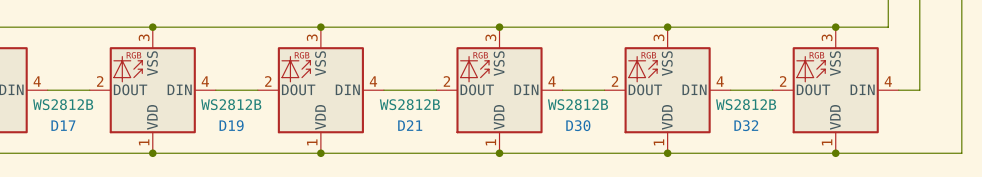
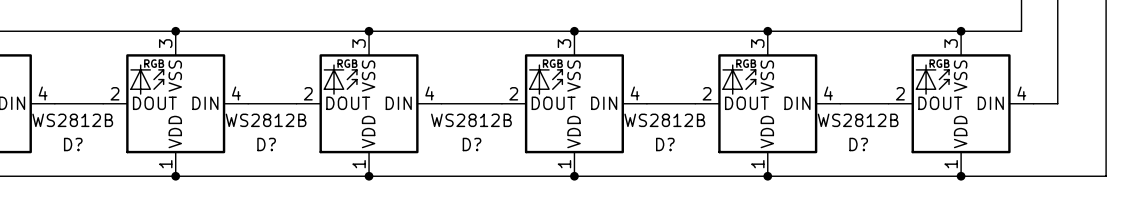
D17 name: D17 (63, 125) -> D? (73, 144)
D19 name: D19 (231, 125) -> D? (266, 144)
D21 name: D21 (410, 125) -> D? (472, 144)
D30 name: D30 (578, 125) -> D? (665, 144)
D32 name: D32 (746, 125) -> D? (858, 144)

